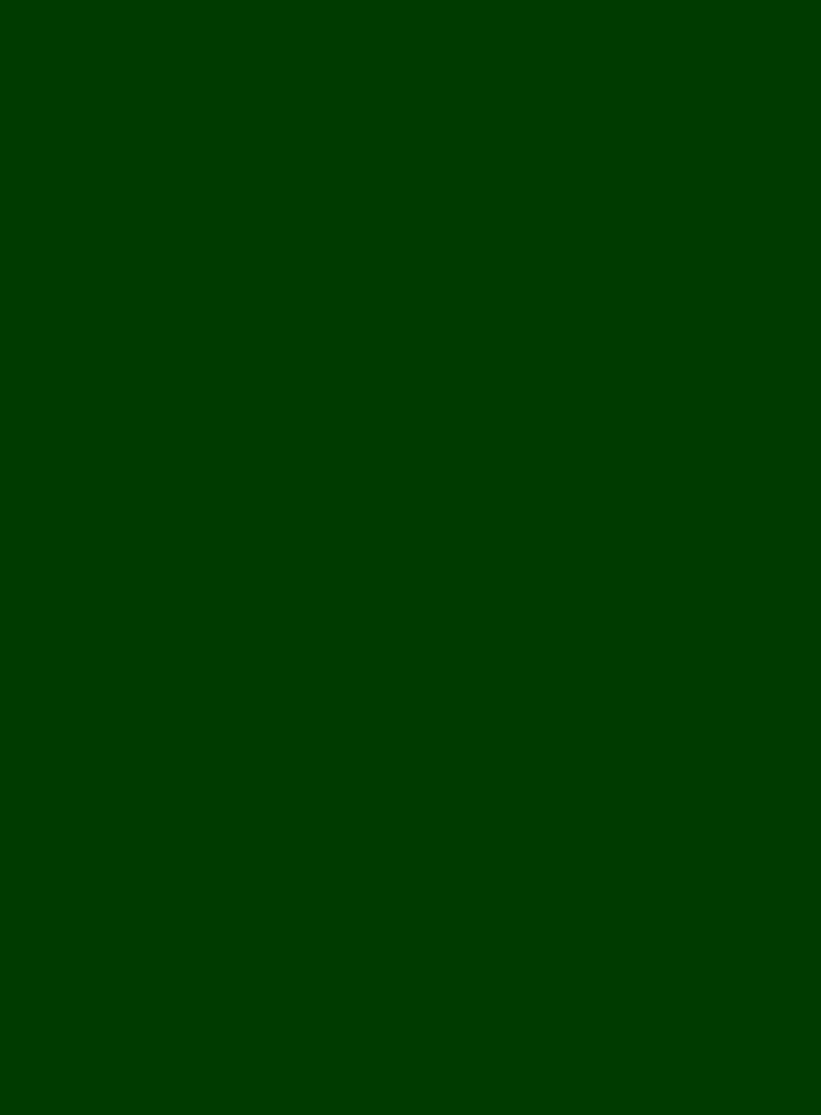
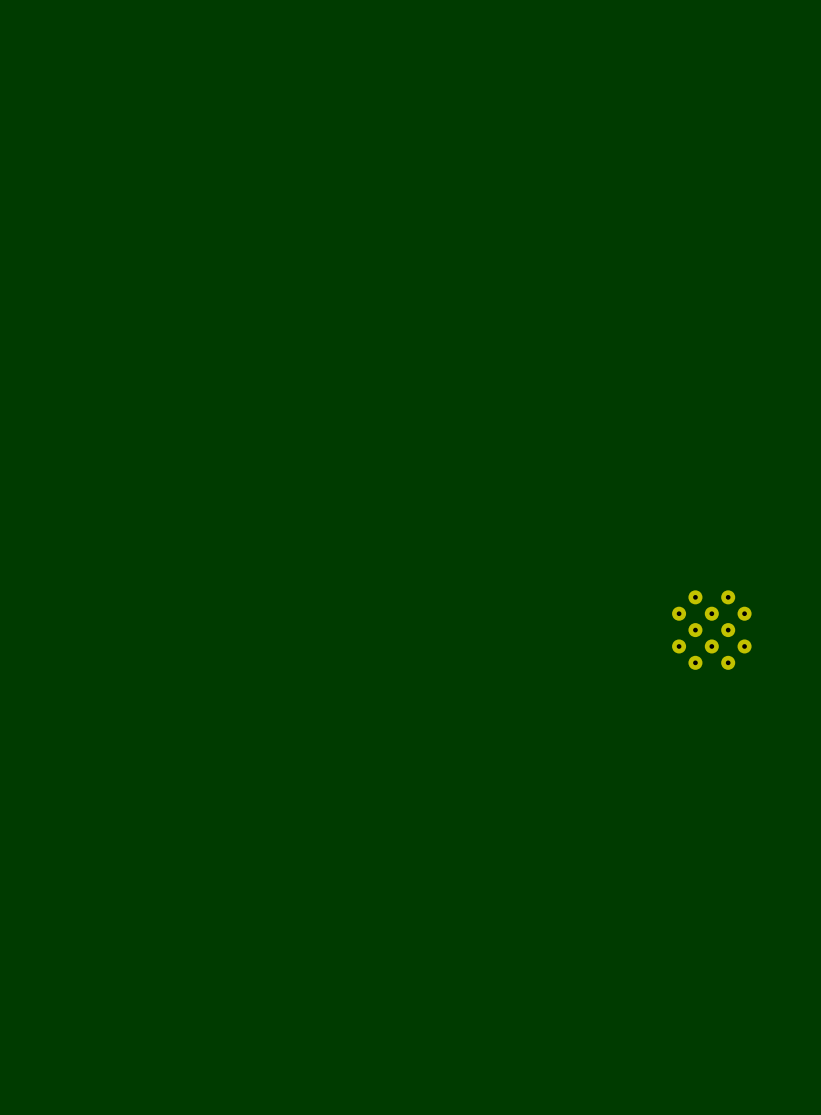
part: none -> (711, 630)

